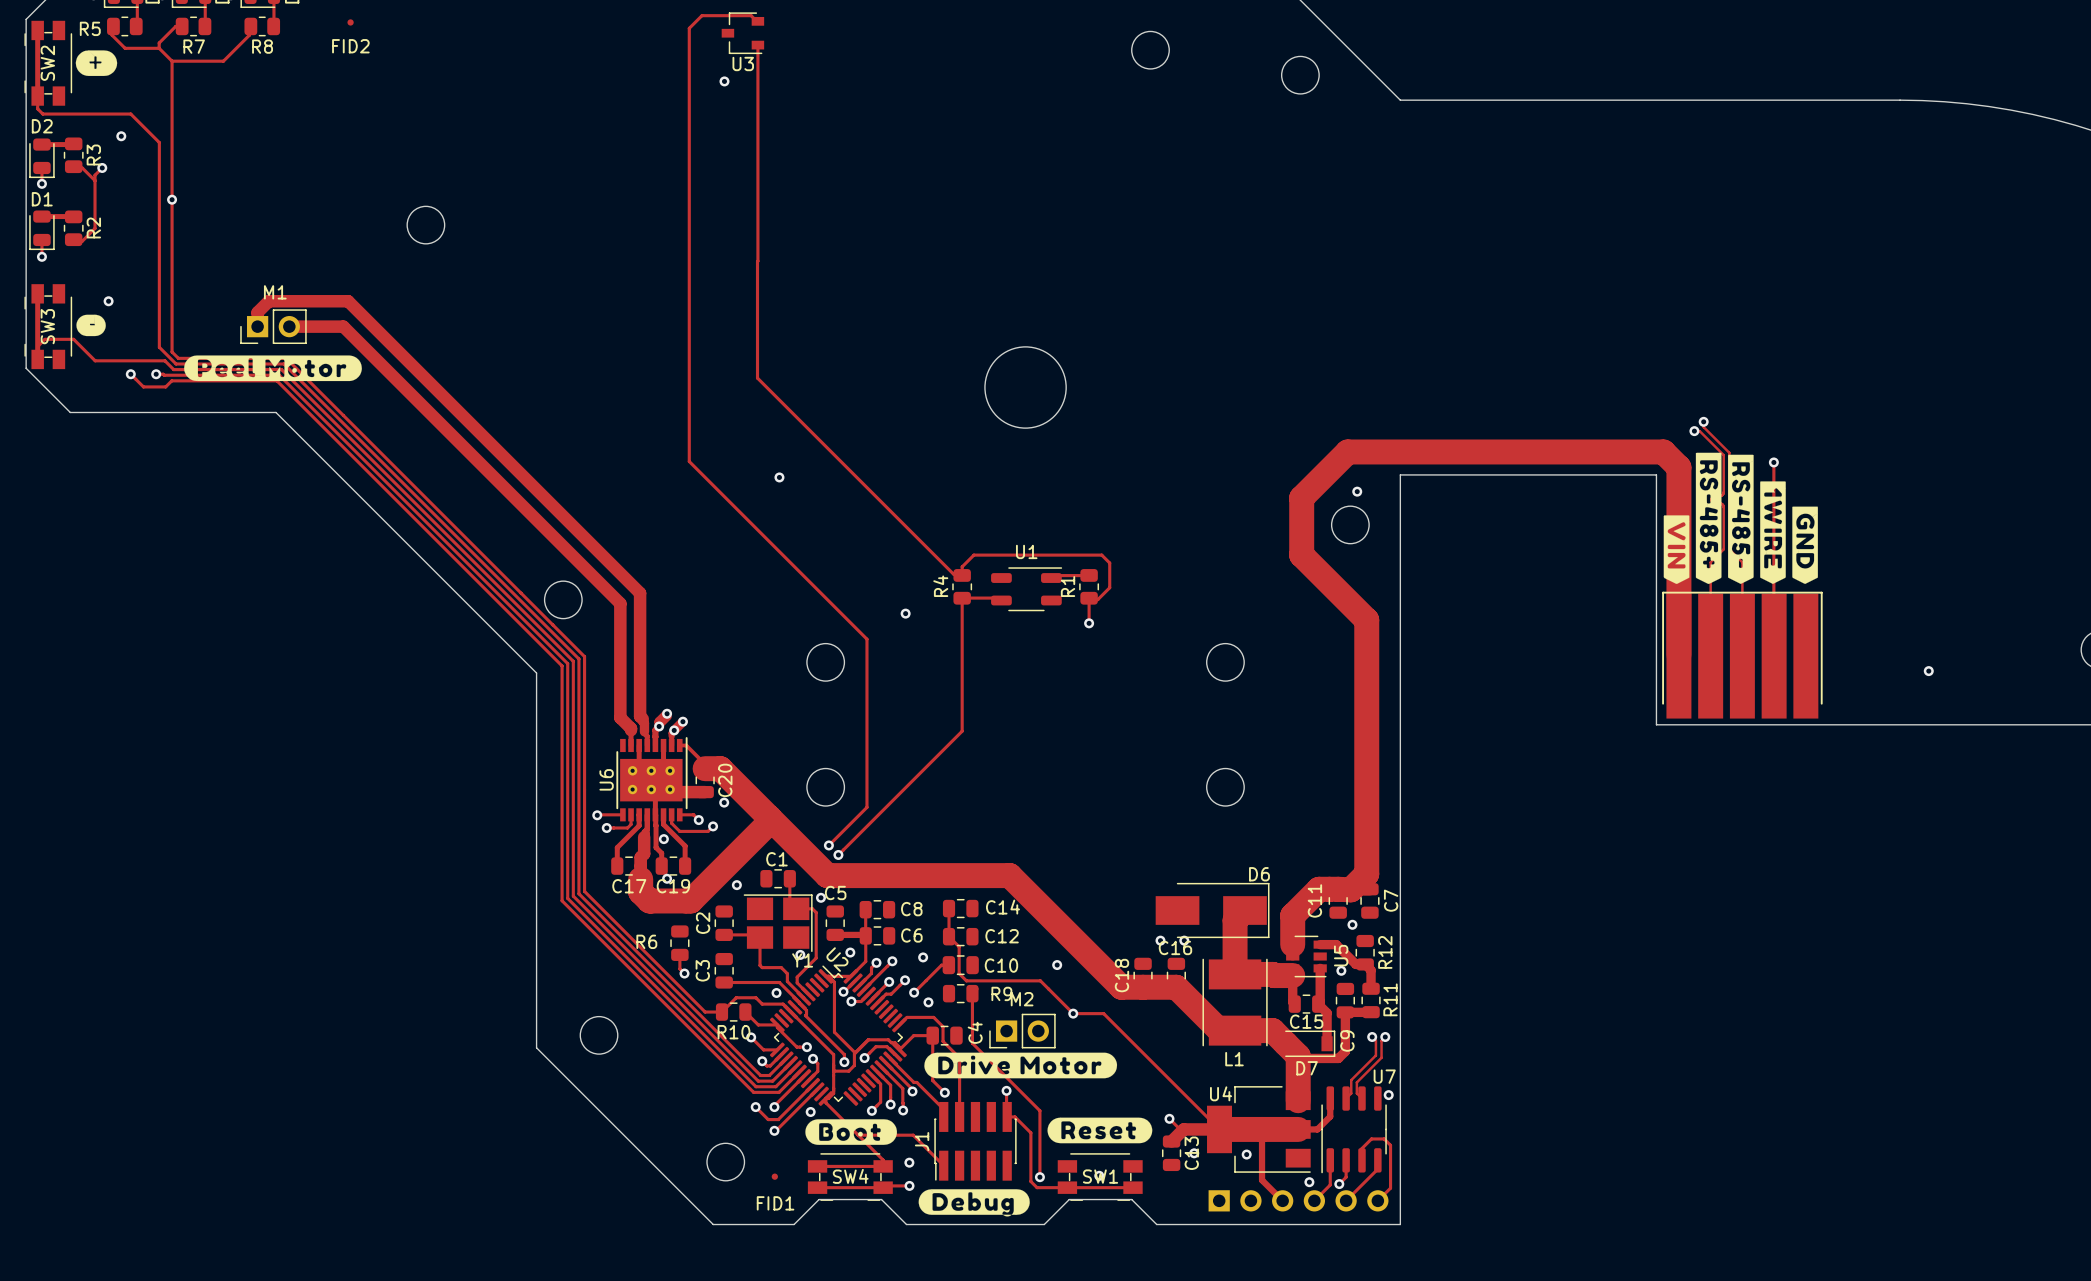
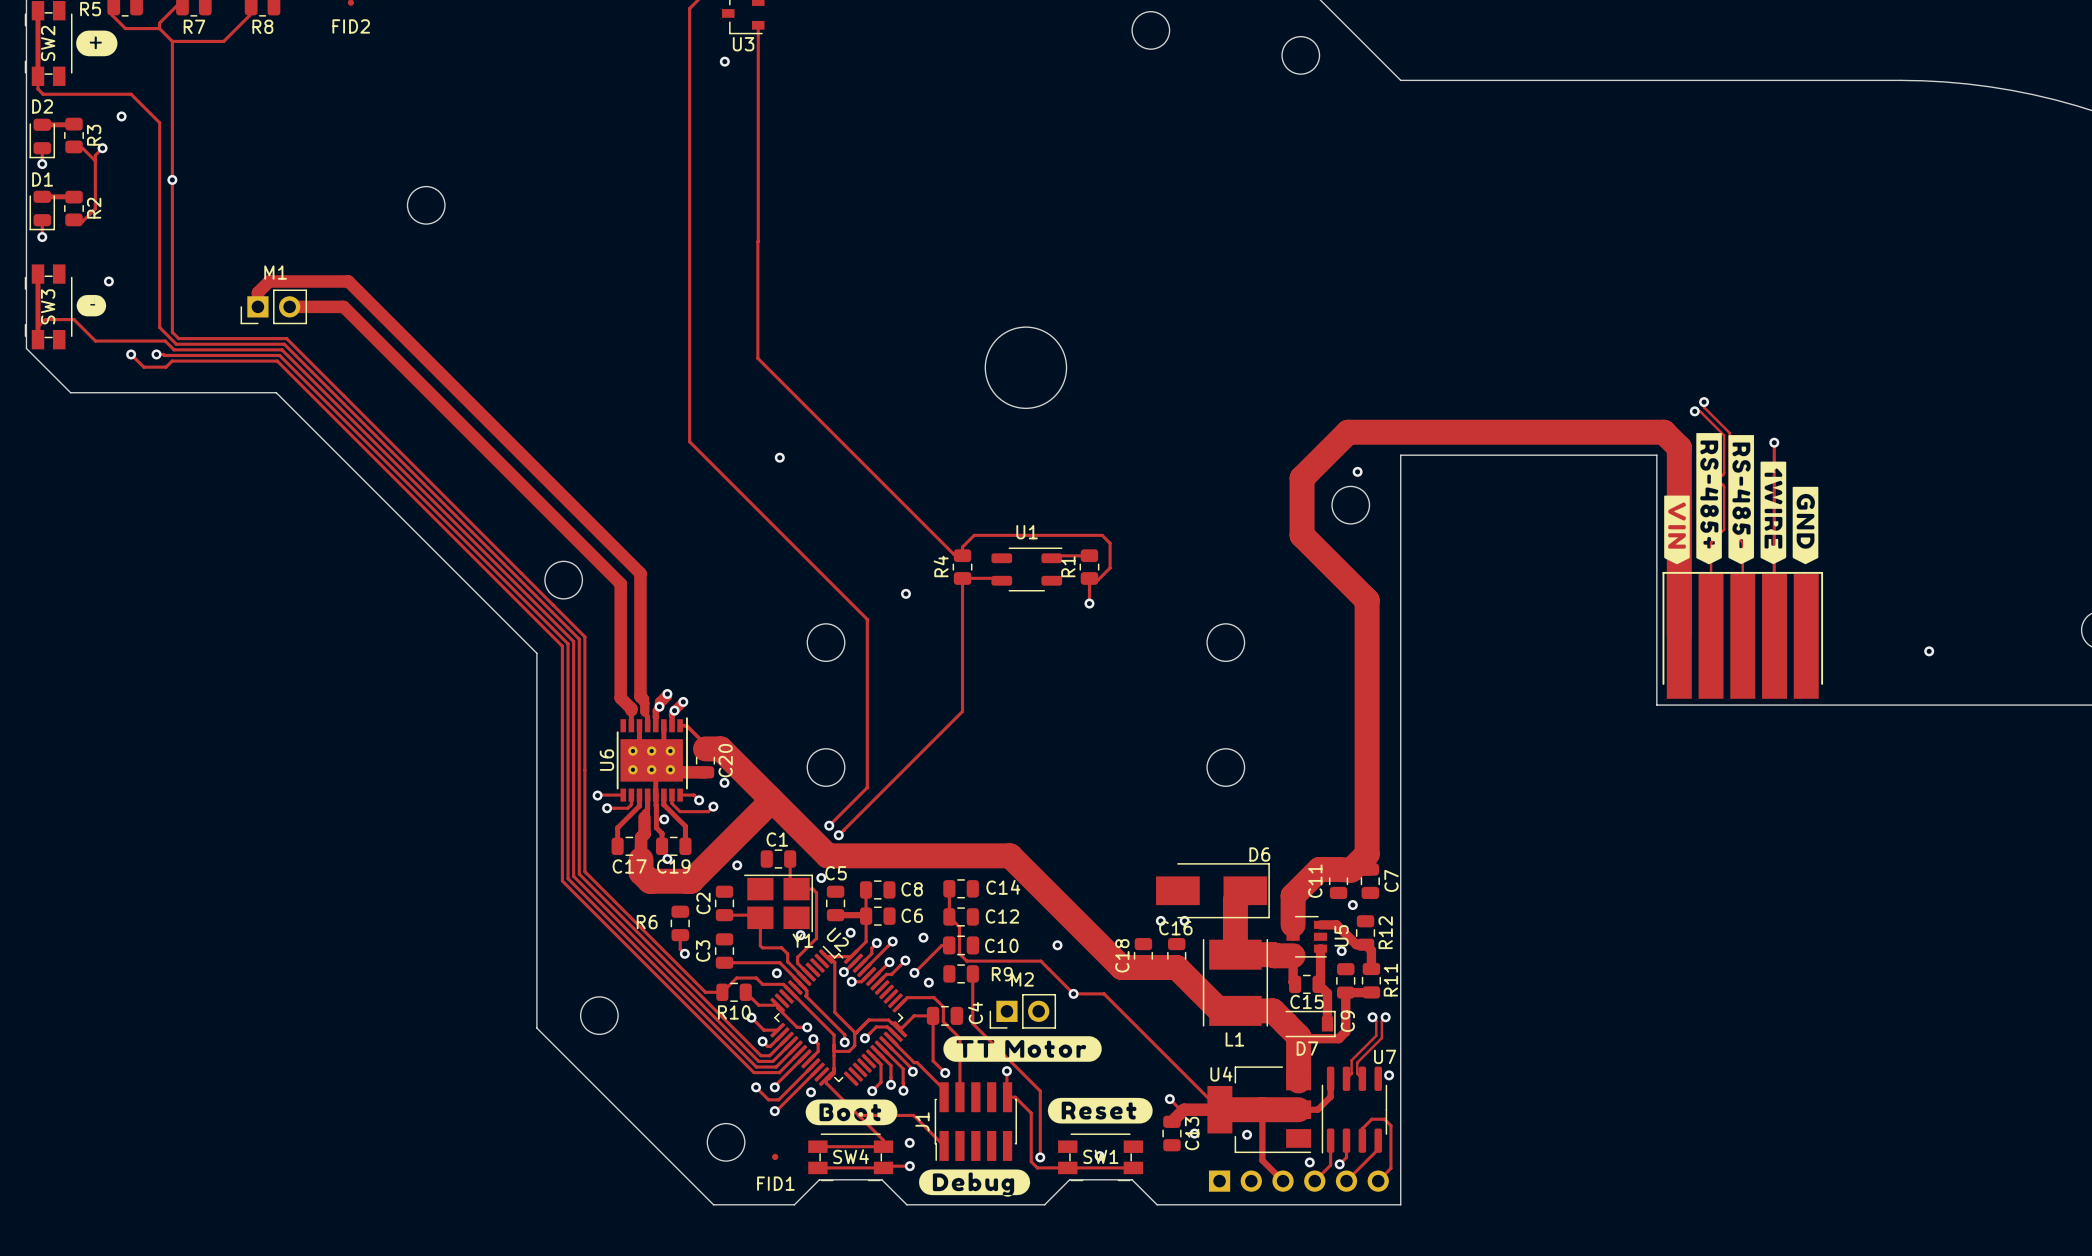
drawing: [184, 355, 362, 382] -> none
drawing shape: [924, 1052, 1118, 1079] -> [943, 1036, 1102, 1062]

